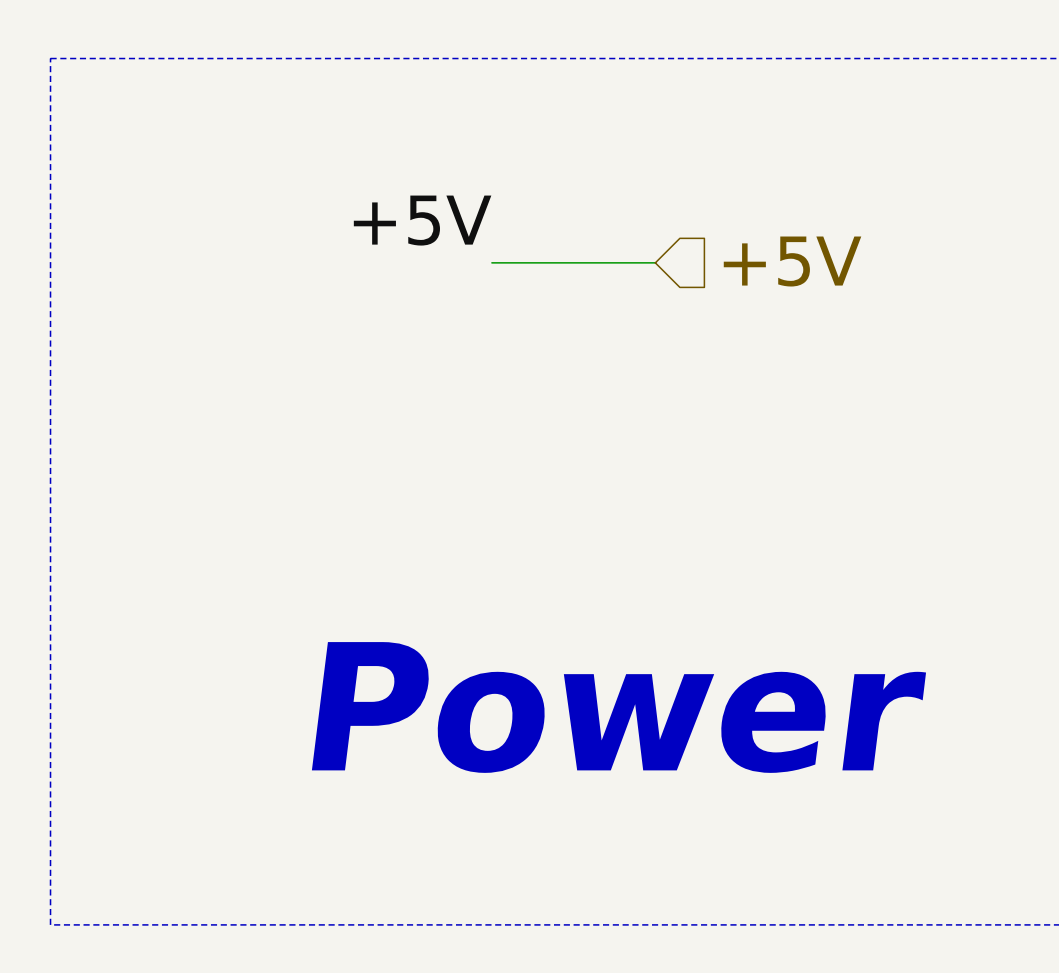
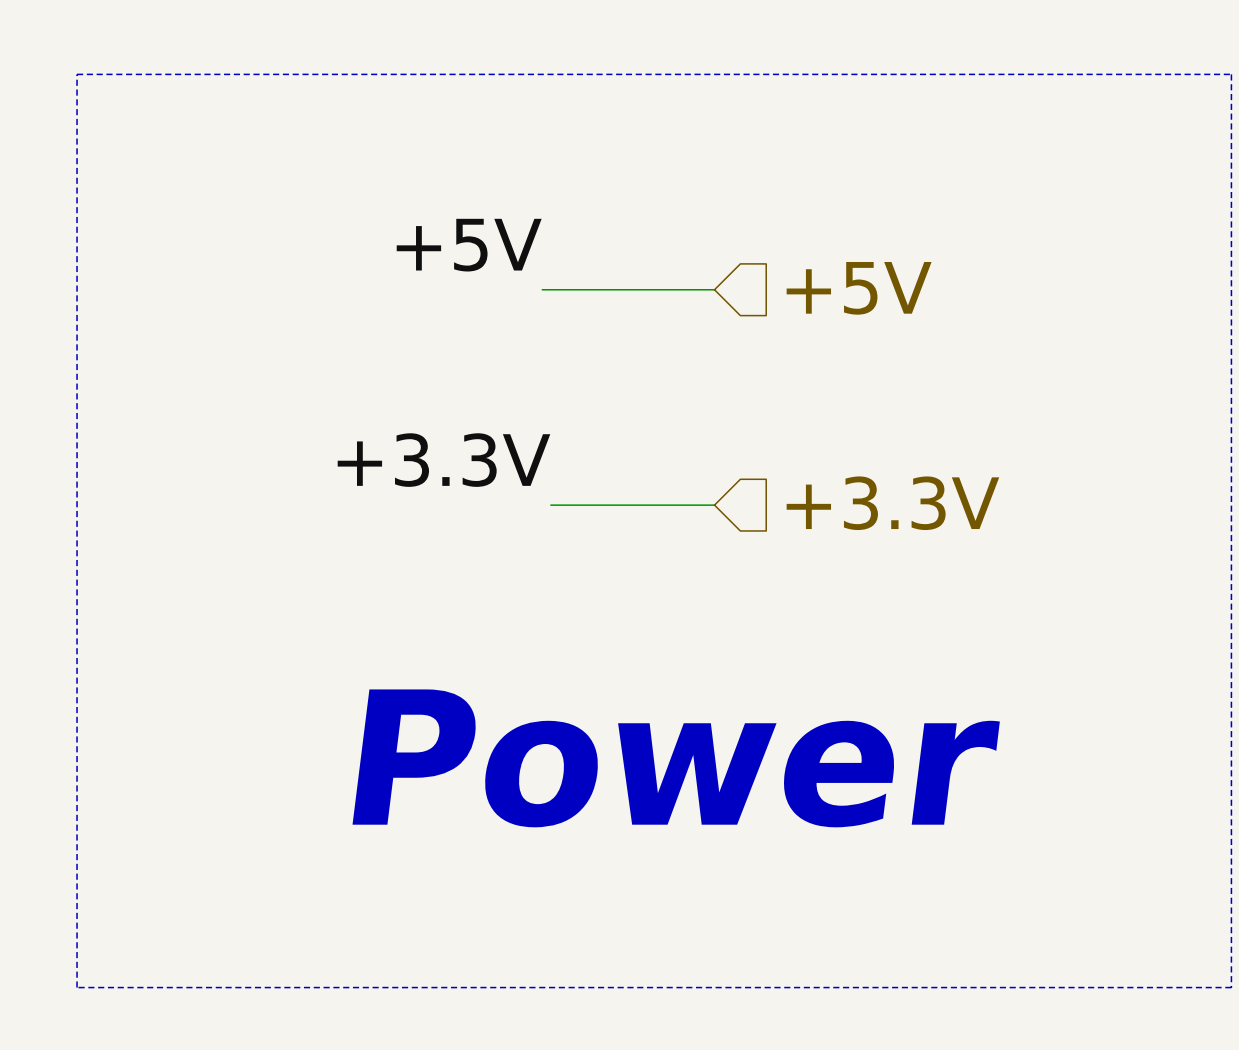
label: none -> +3.3V (443, 460)
hierarchical label: none -> +3.3V (892, 503)
wire: none -> (550, 505) (714, 505)

